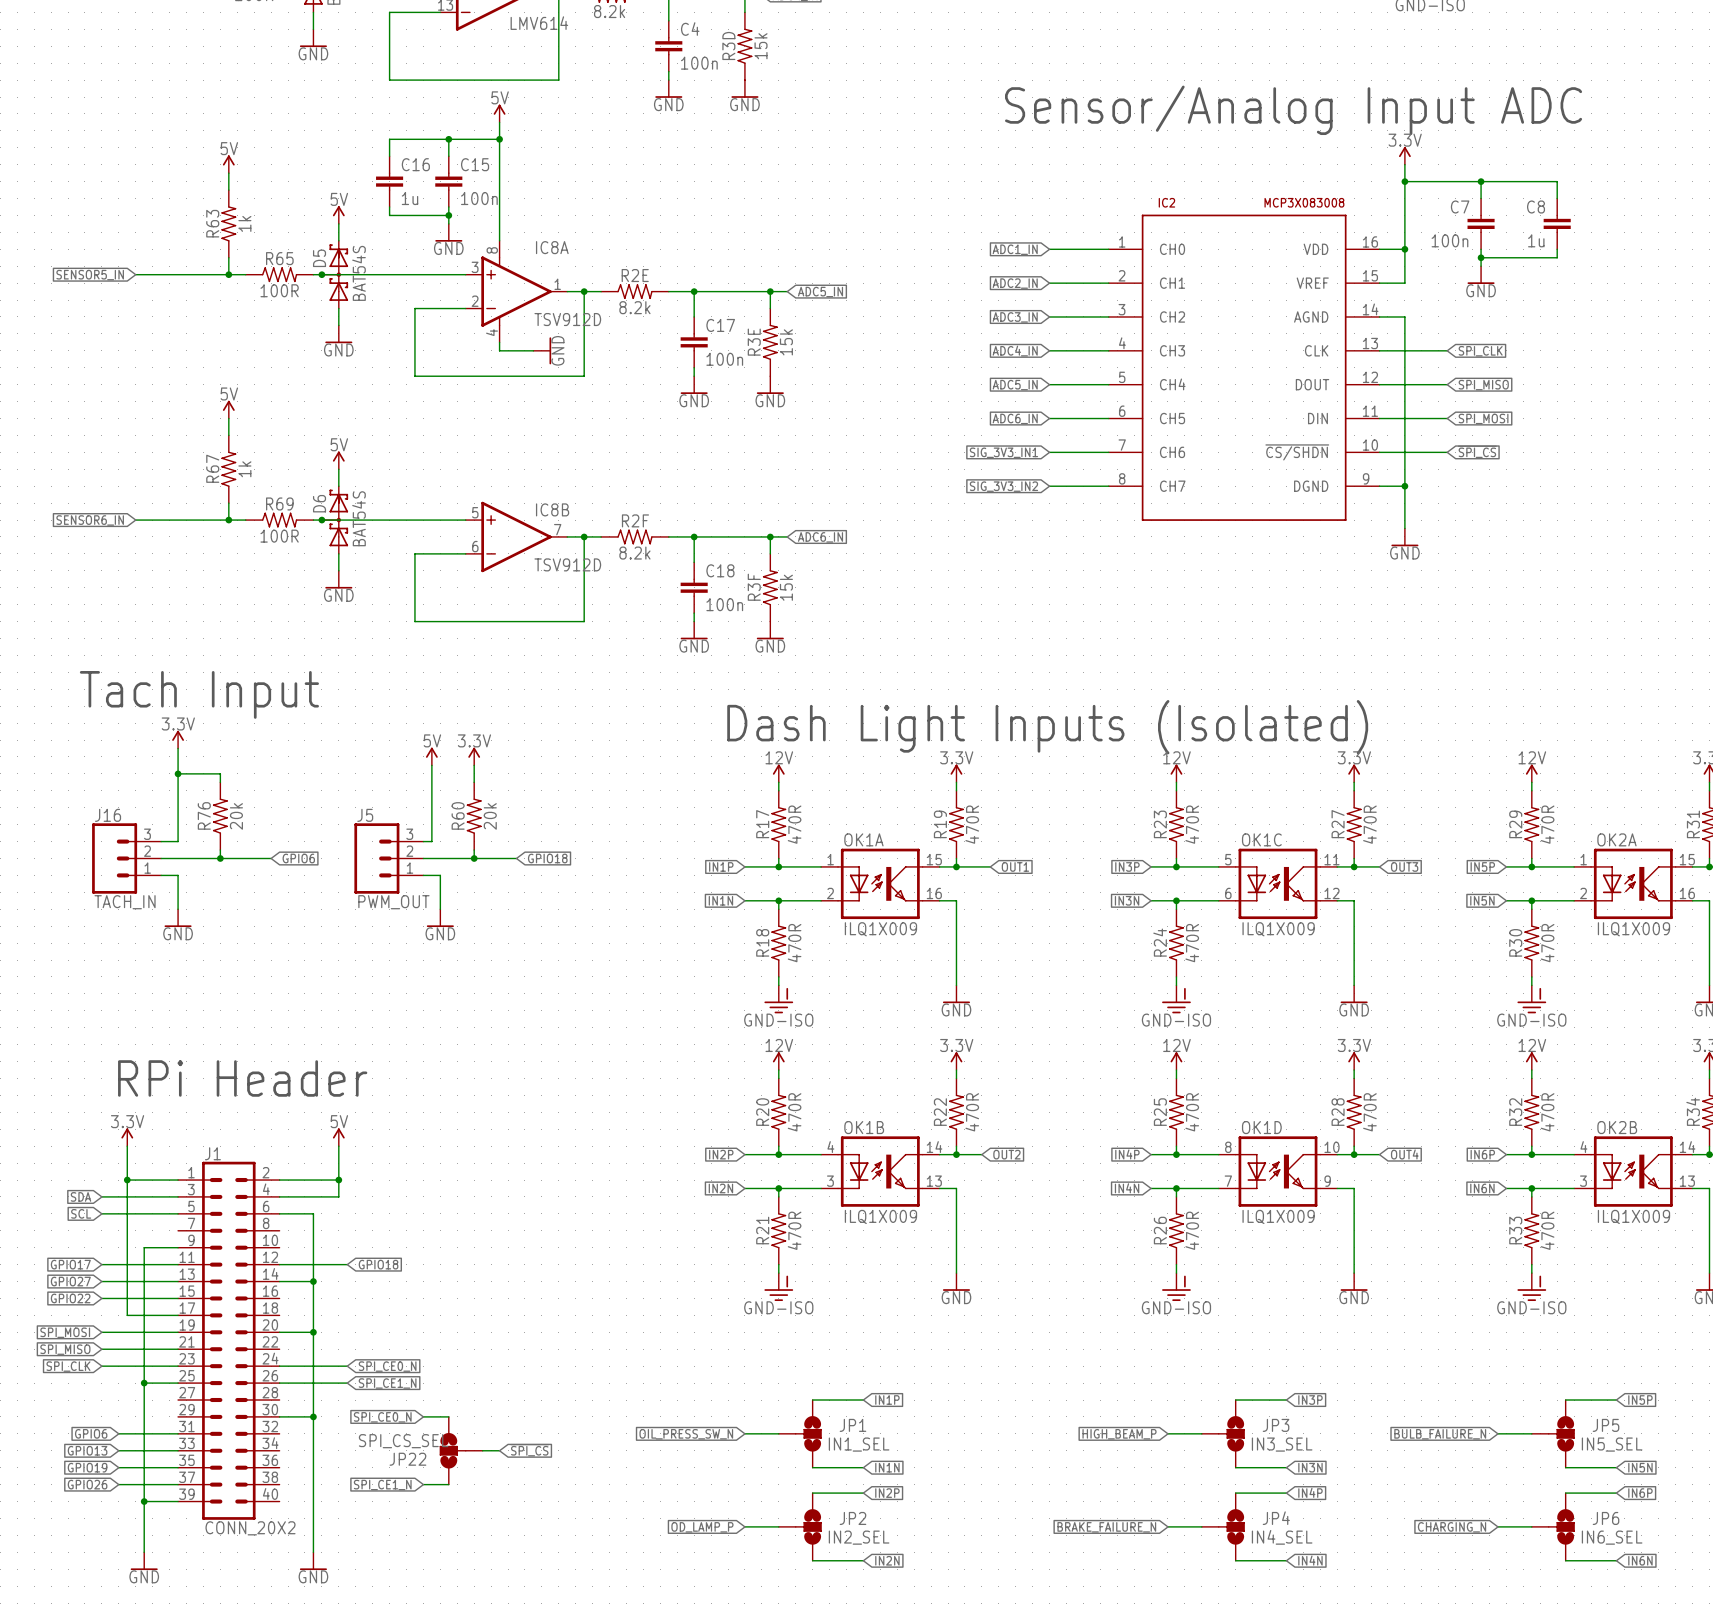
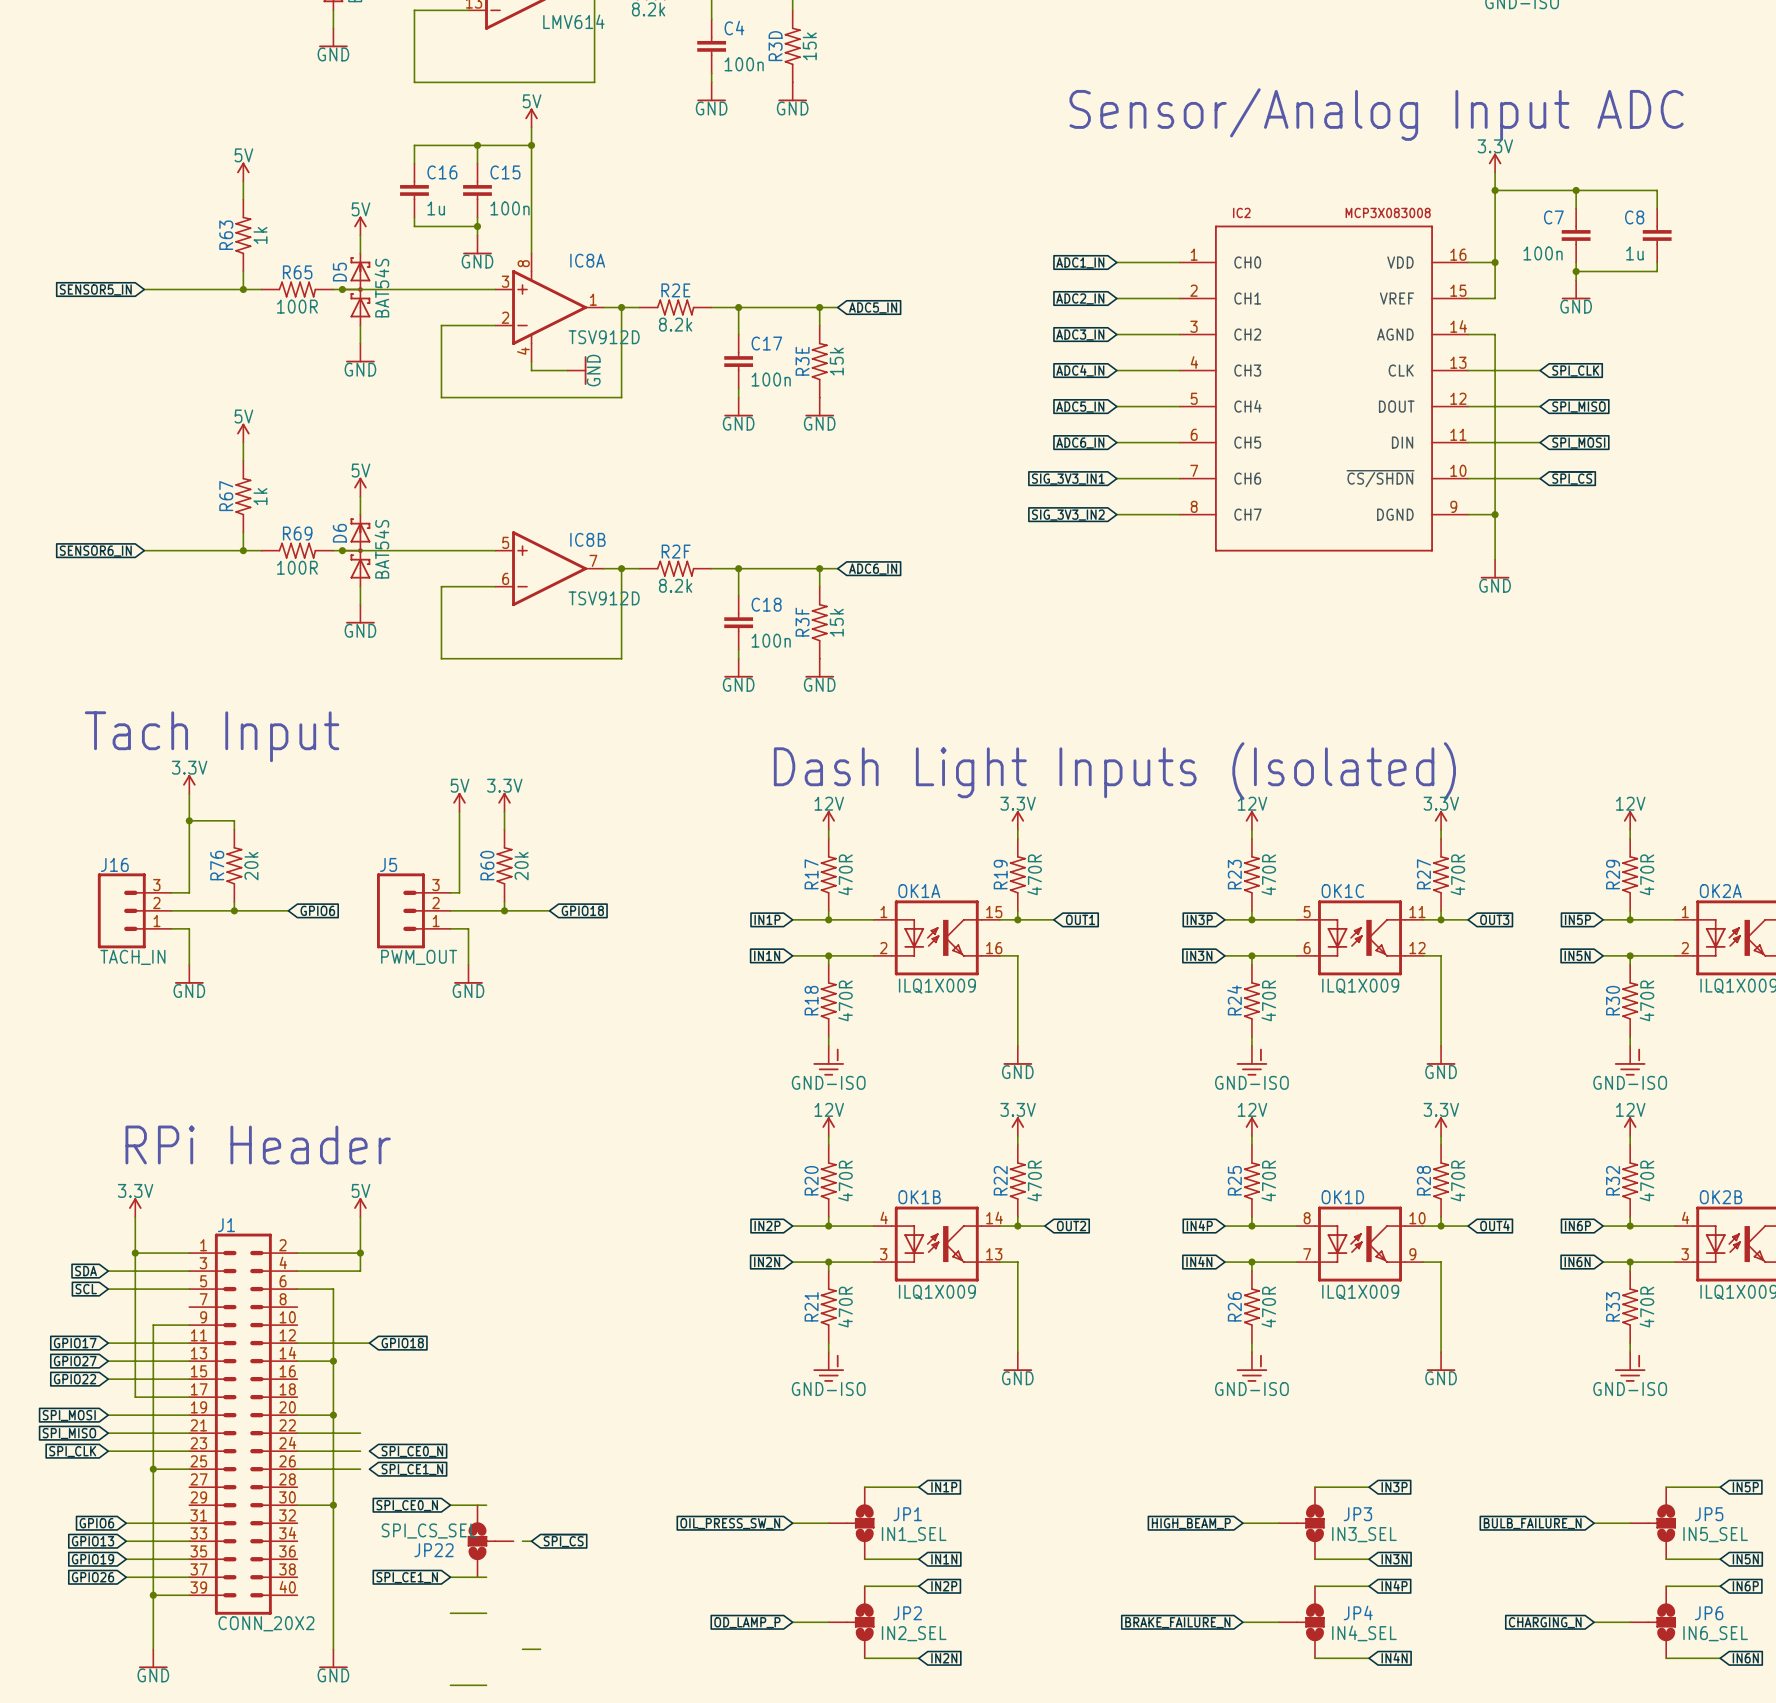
wire: none -> (297, 1433) (360, 1433)
wire: (338, 1366) (347, 1366) -> none
wire: (338, 1383) (347, 1383) -> (477, 1577) (486, 1577)
wire: (482, 1450) (491, 1450) -> (477, 1505) (486, 1505)
wire: none -> (450, 1613) (486, 1613)
wire: none -> (522, 1649) (540, 1649)
wire: none -> (450, 1685) (486, 1685)

